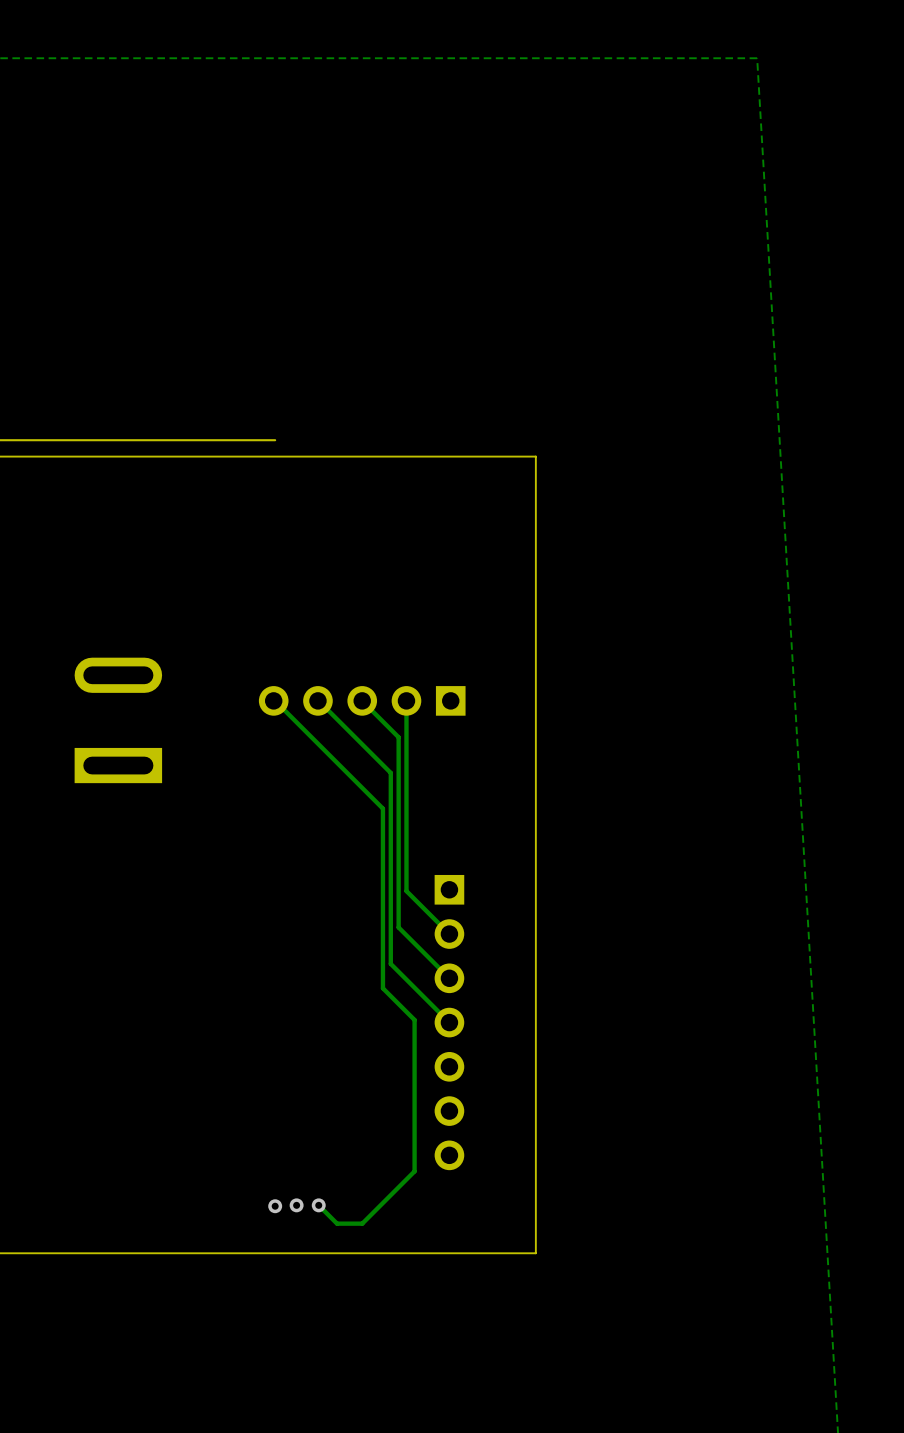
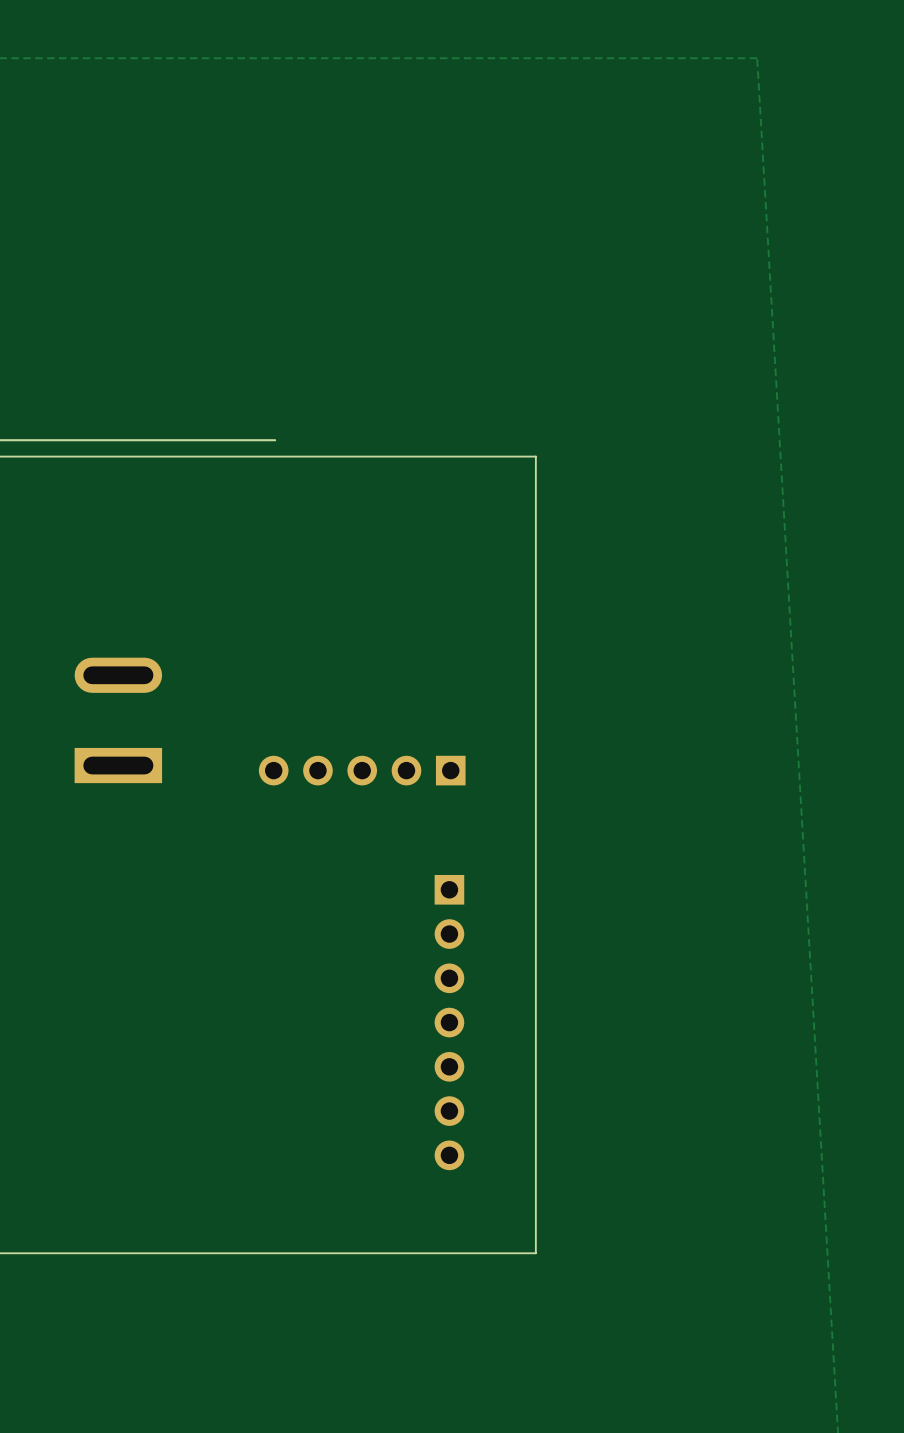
track: (273, 700) (382, 808) (382, 988) (414, 1019) (414, 1171) (362, 1223) (337, 1223) (318, 1205) -> none
track: (317, 700) (390, 772) (390, 963) (449, 1022) -> none
track: (362, 700) (398, 737) (398, 927) (449, 978) -> none
part position: (362, 700) -> (362, 770)
track: (406, 700) (406, 891) (449, 934) -> none
via: (296, 1205) -> none
via: (318, 1205) -> none
via: (275, 1206) -> none

